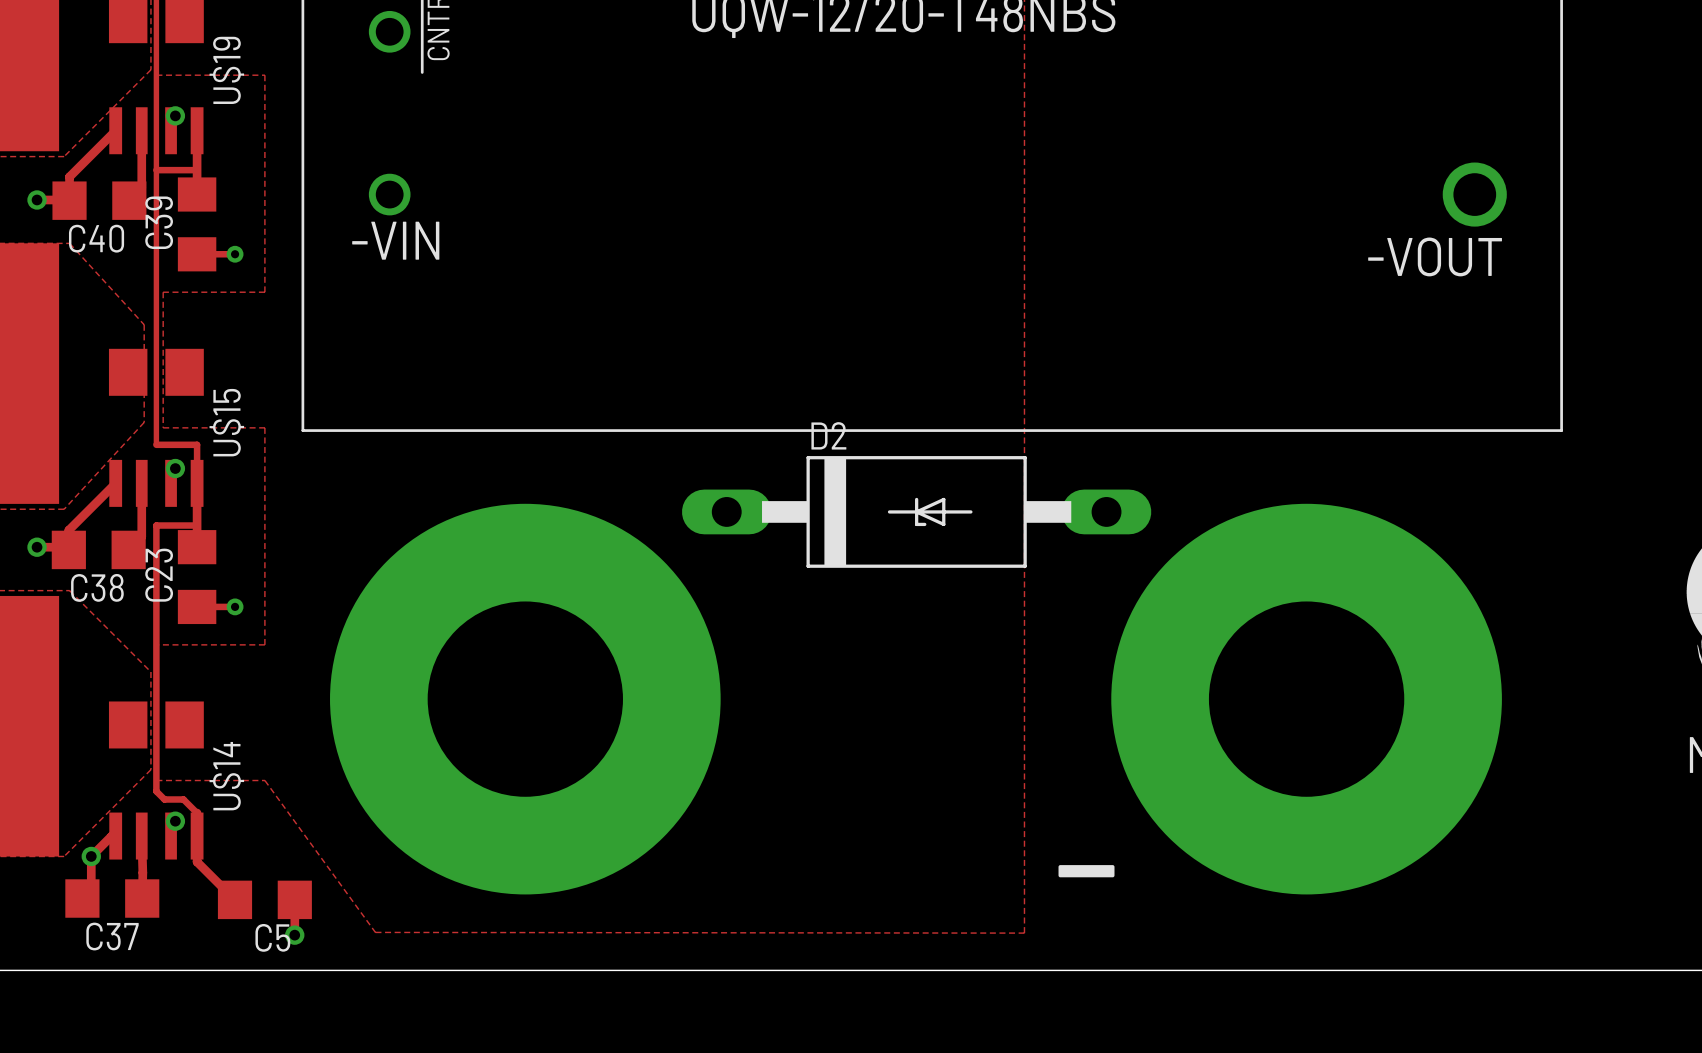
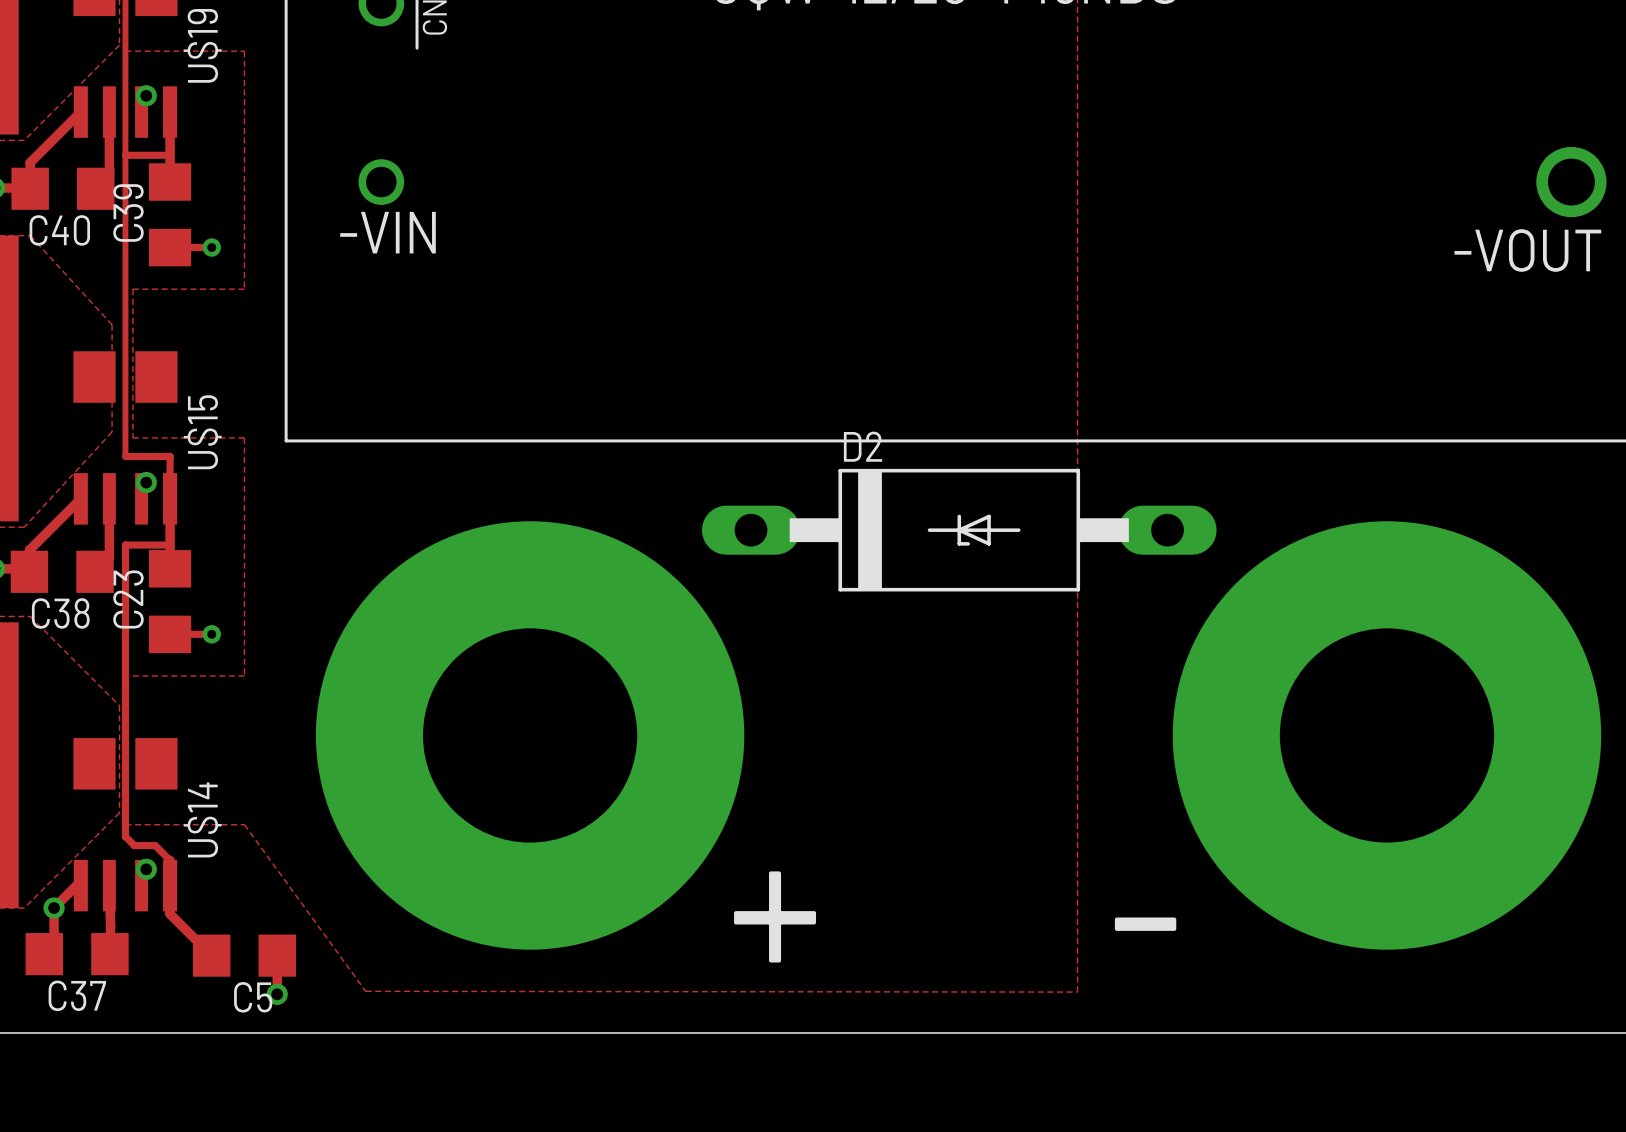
text: none -> + (775, 916)

